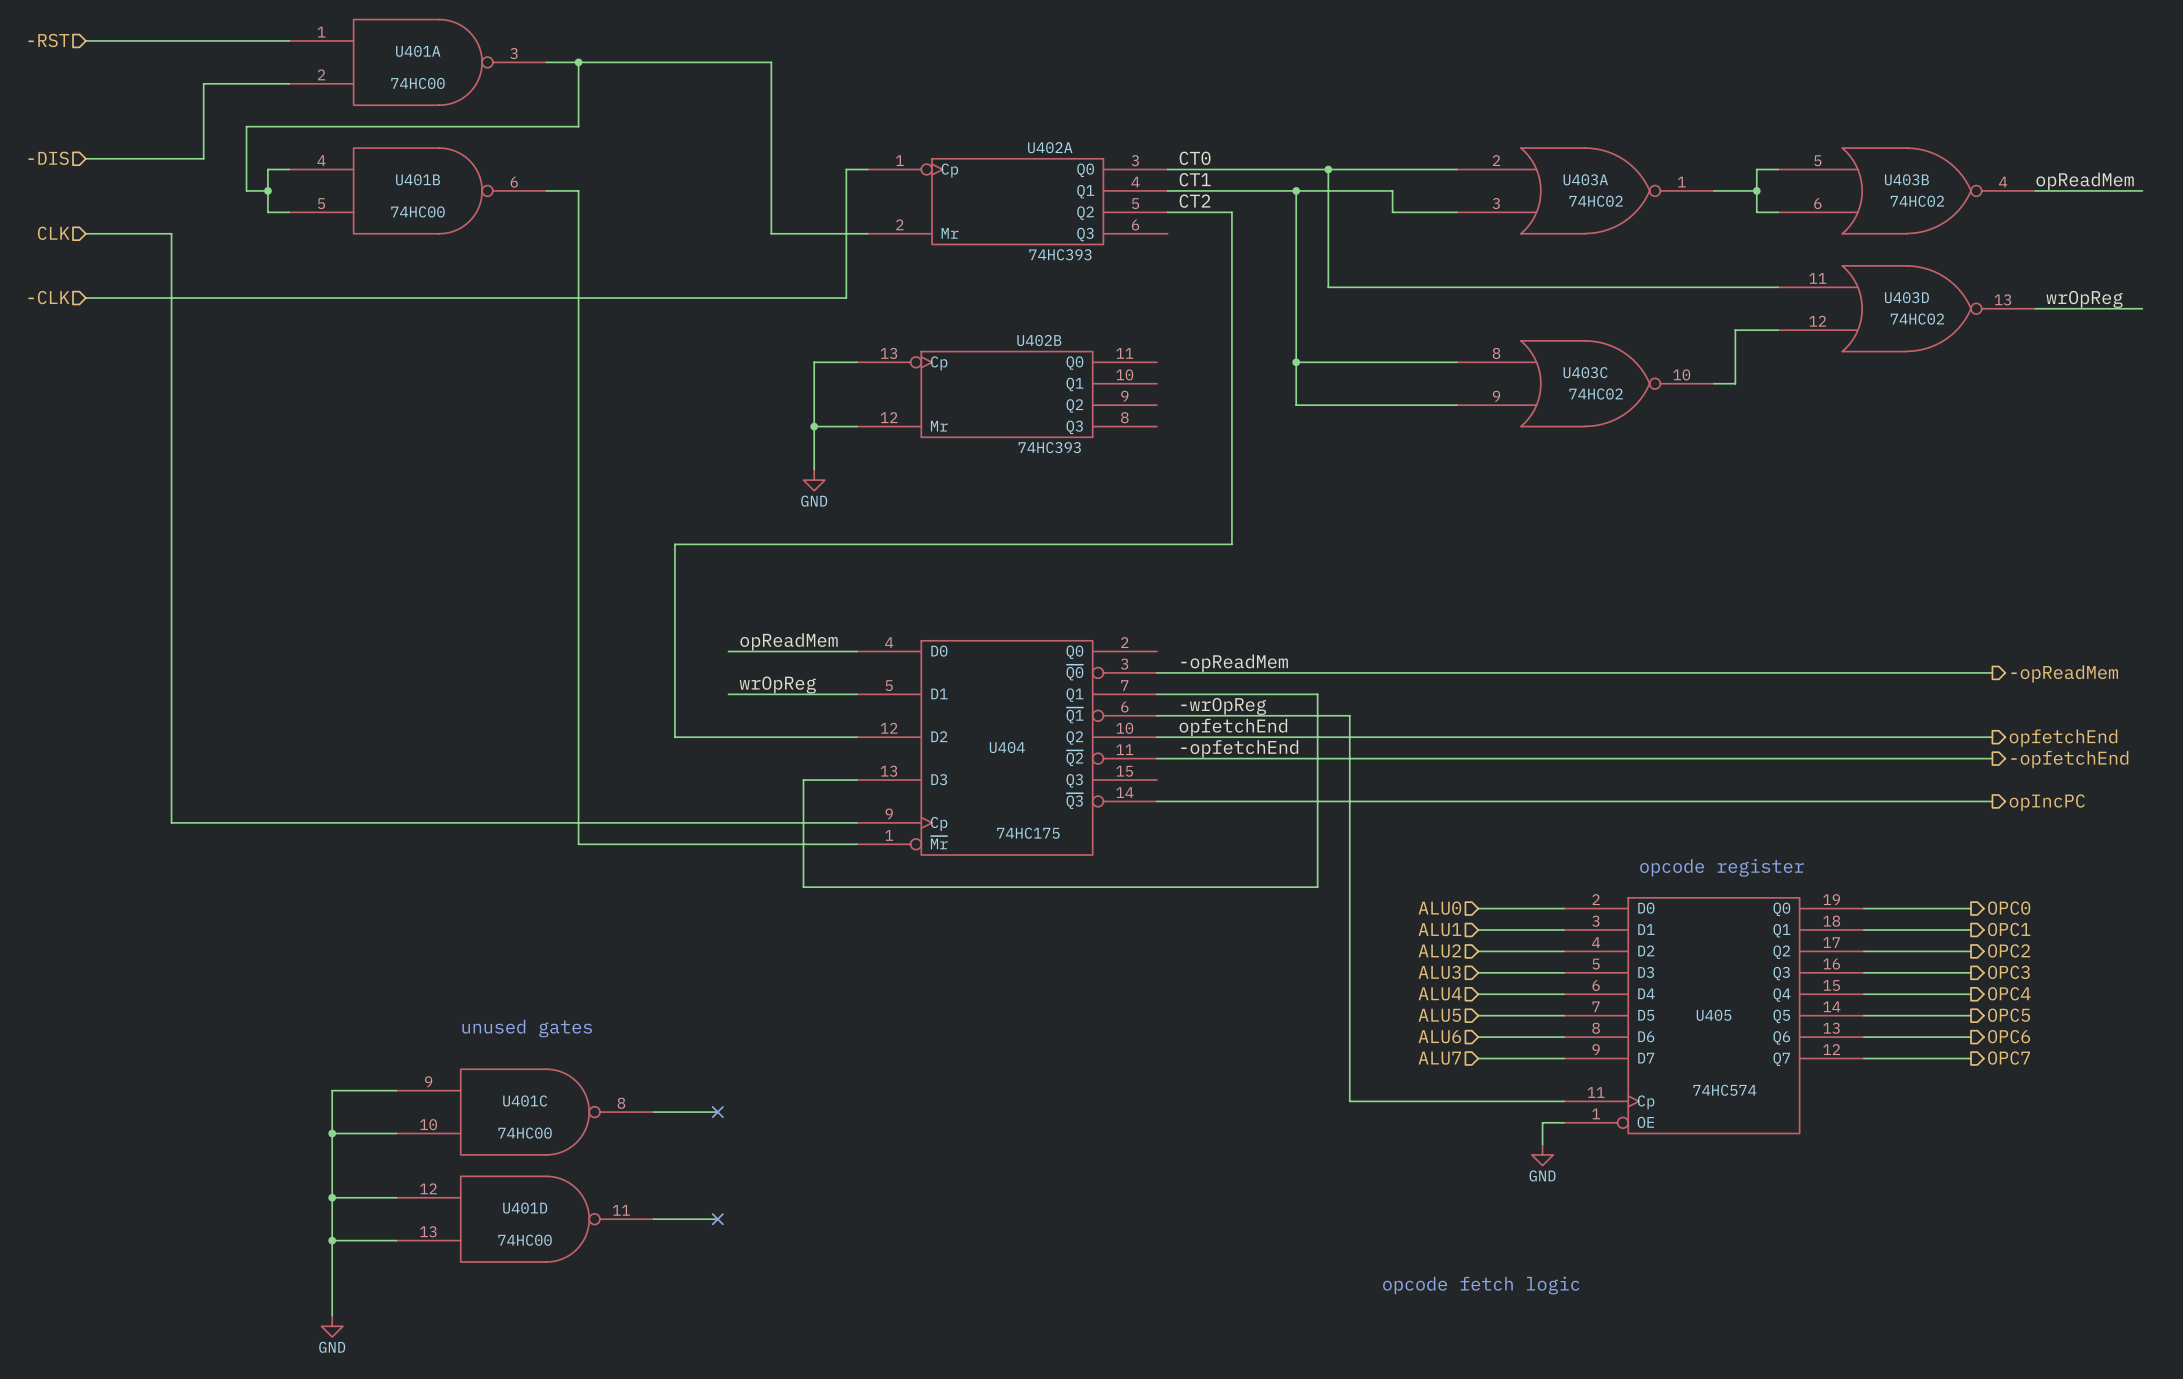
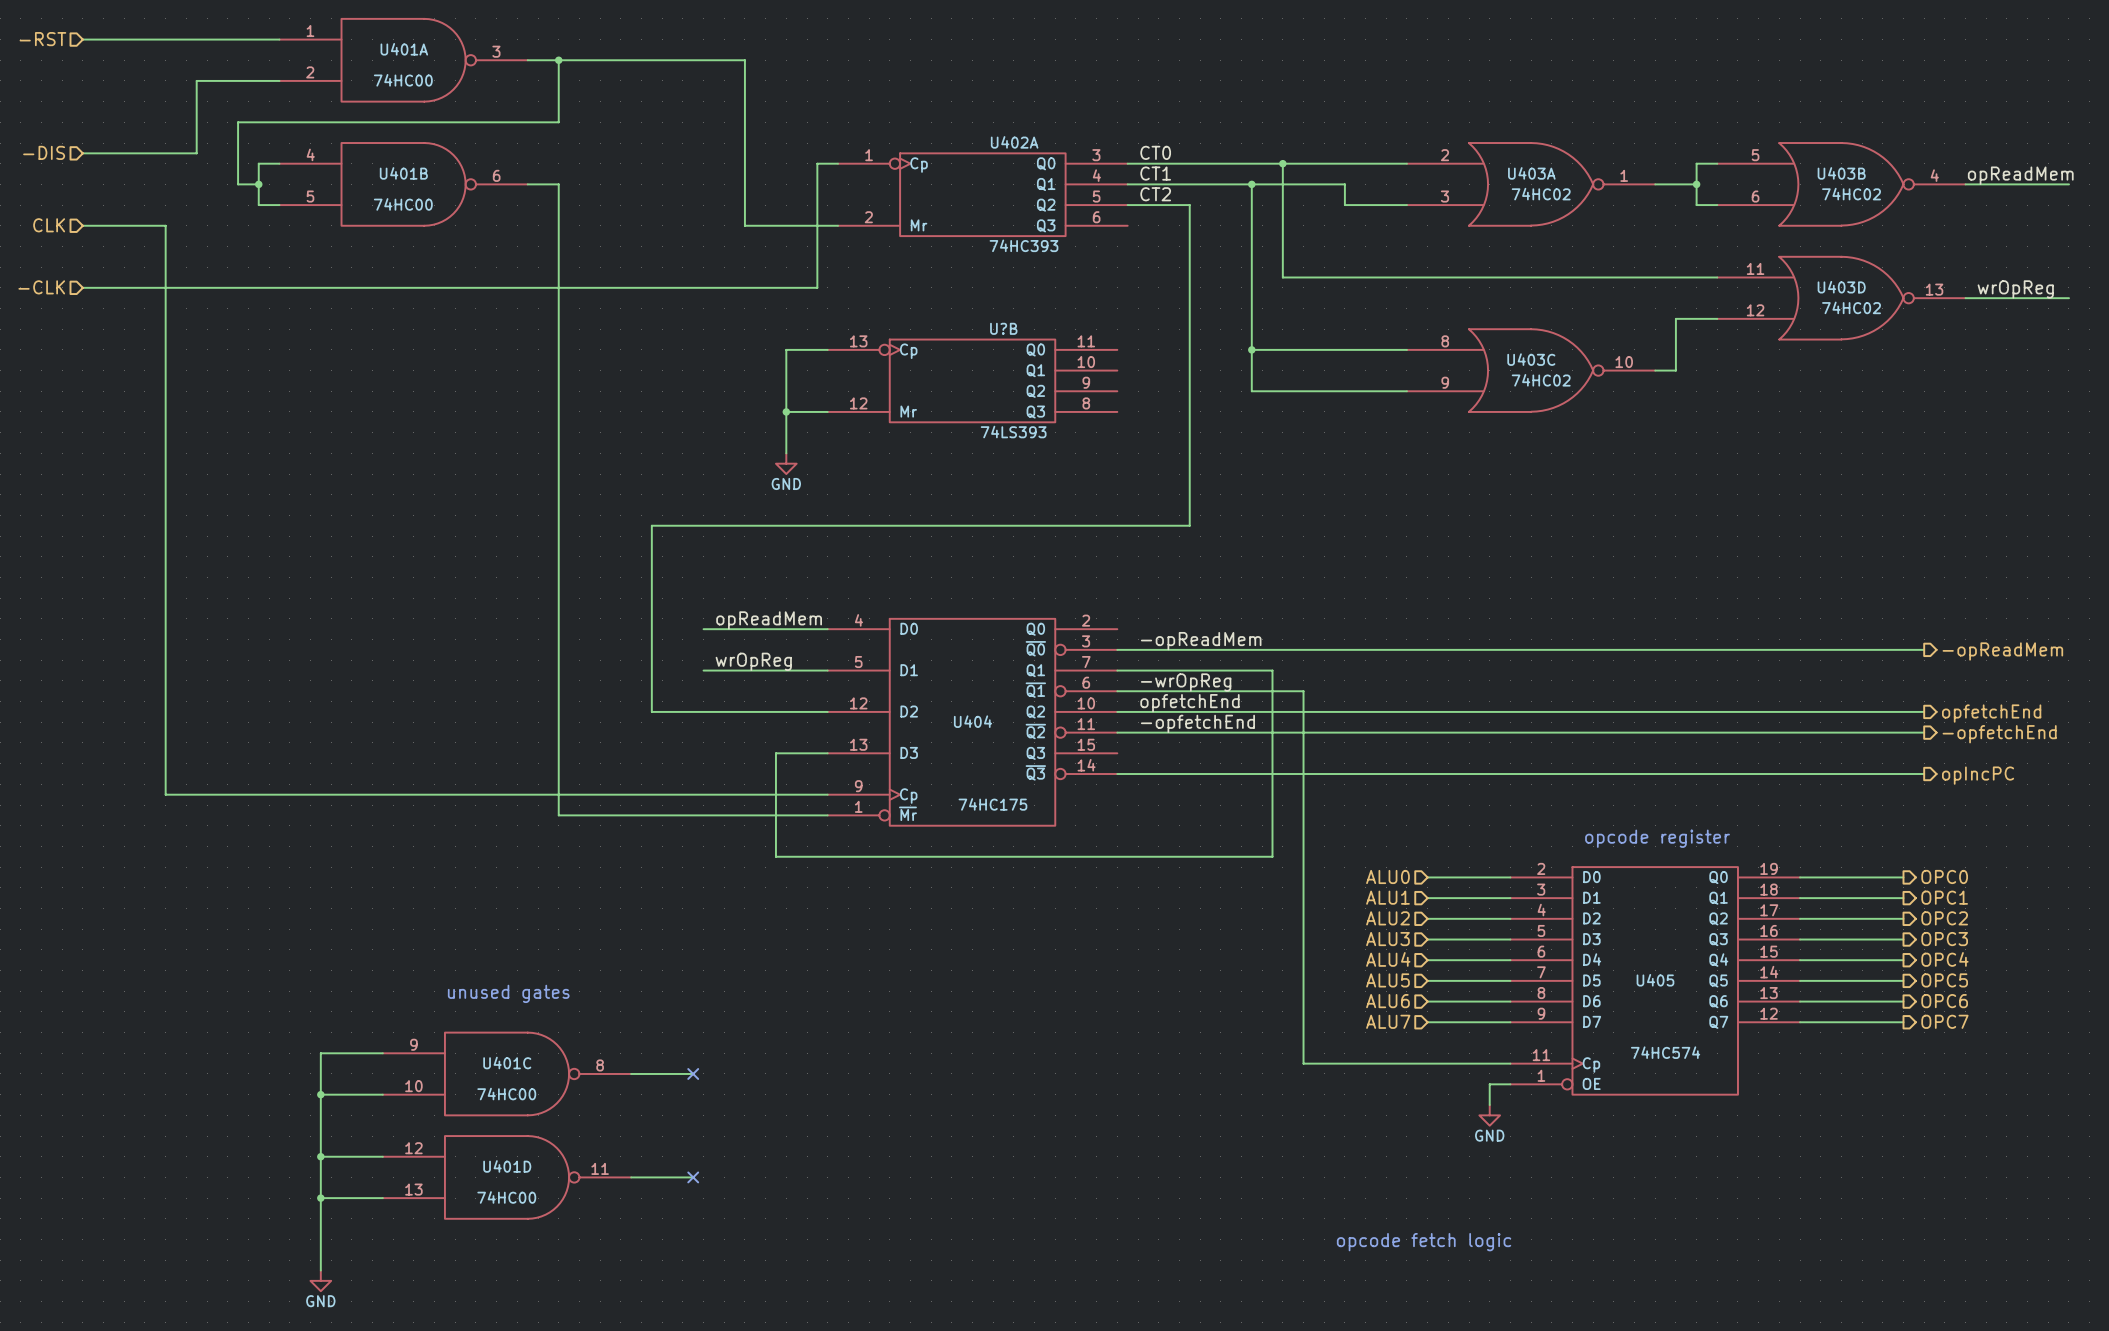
U402B name: U402B (1039, 340) -> U?B (1003, 328)
U402B value: 74HC393 (1049, 447) -> 74LS393 (1013, 432)

